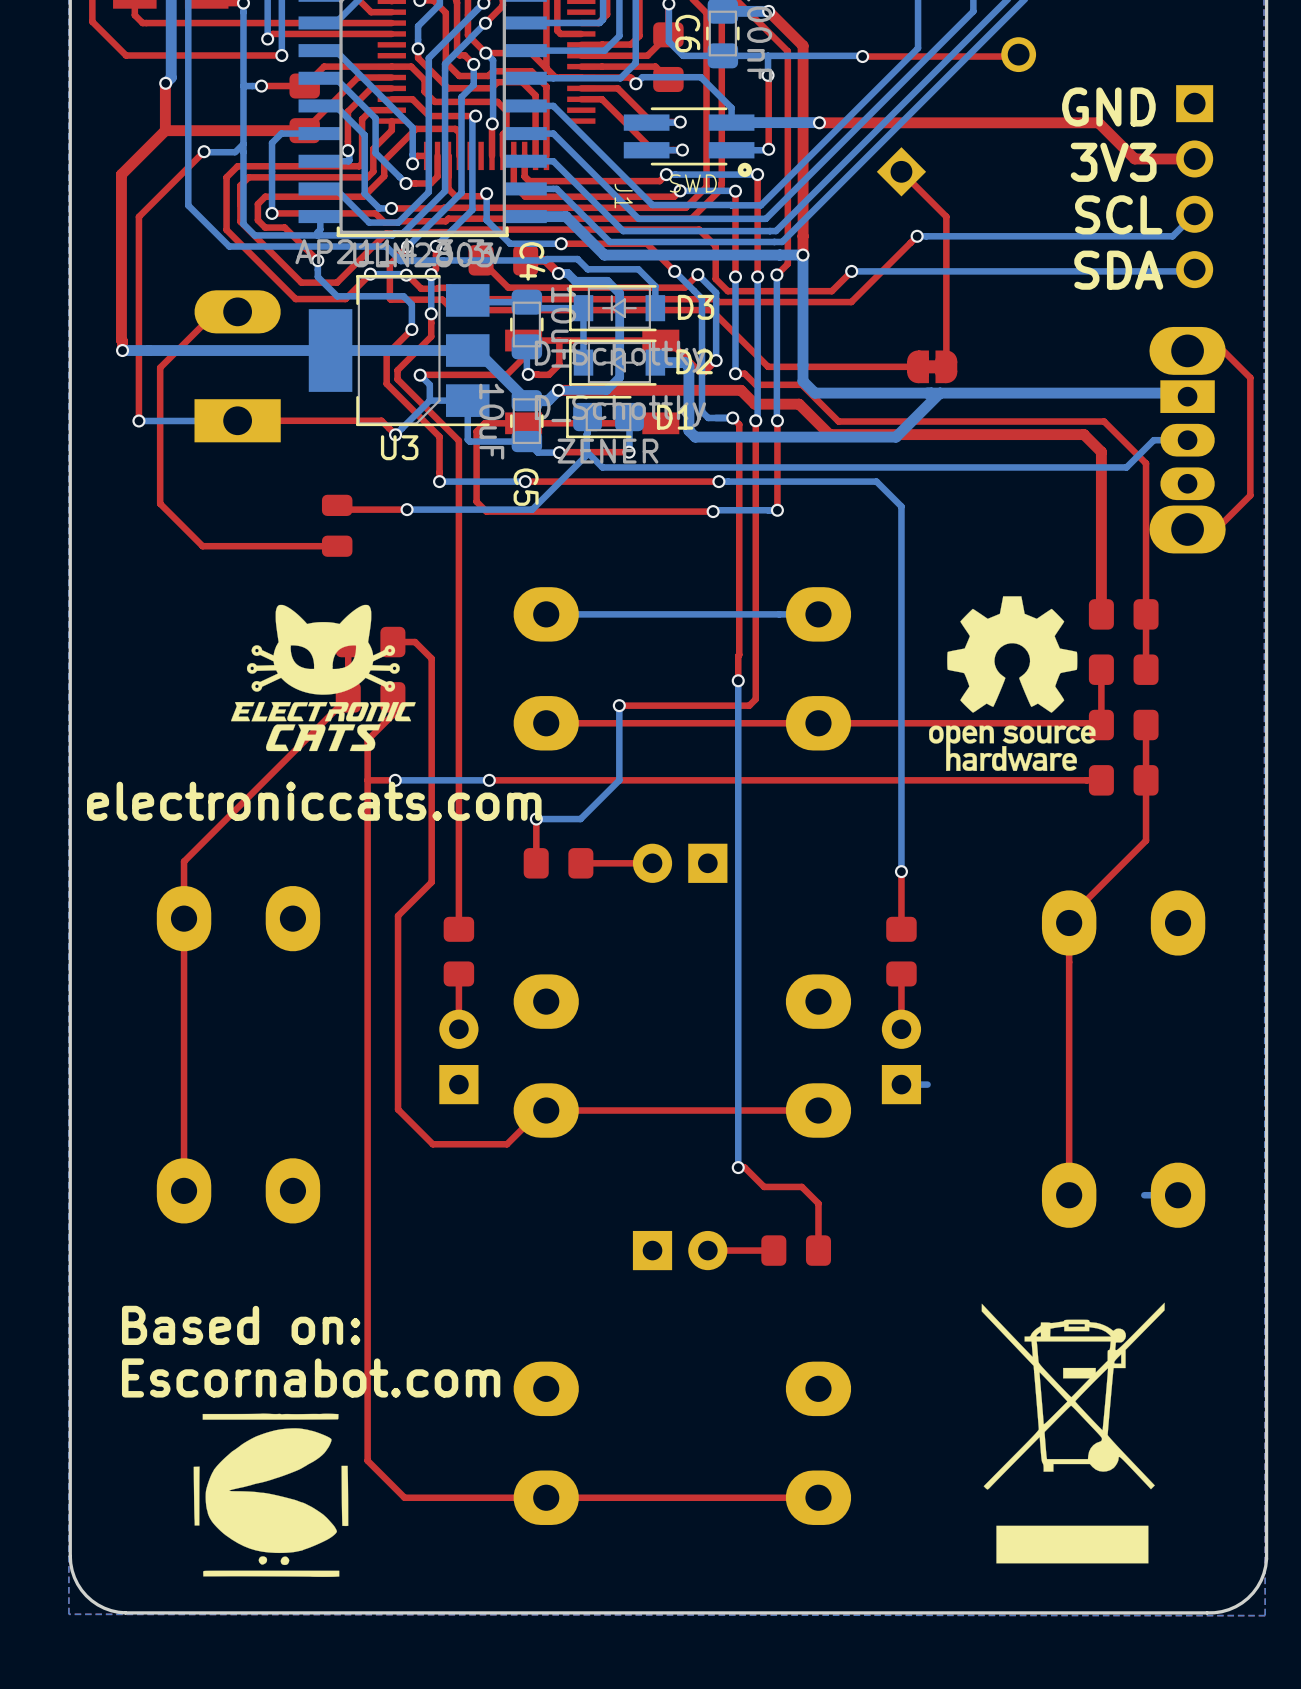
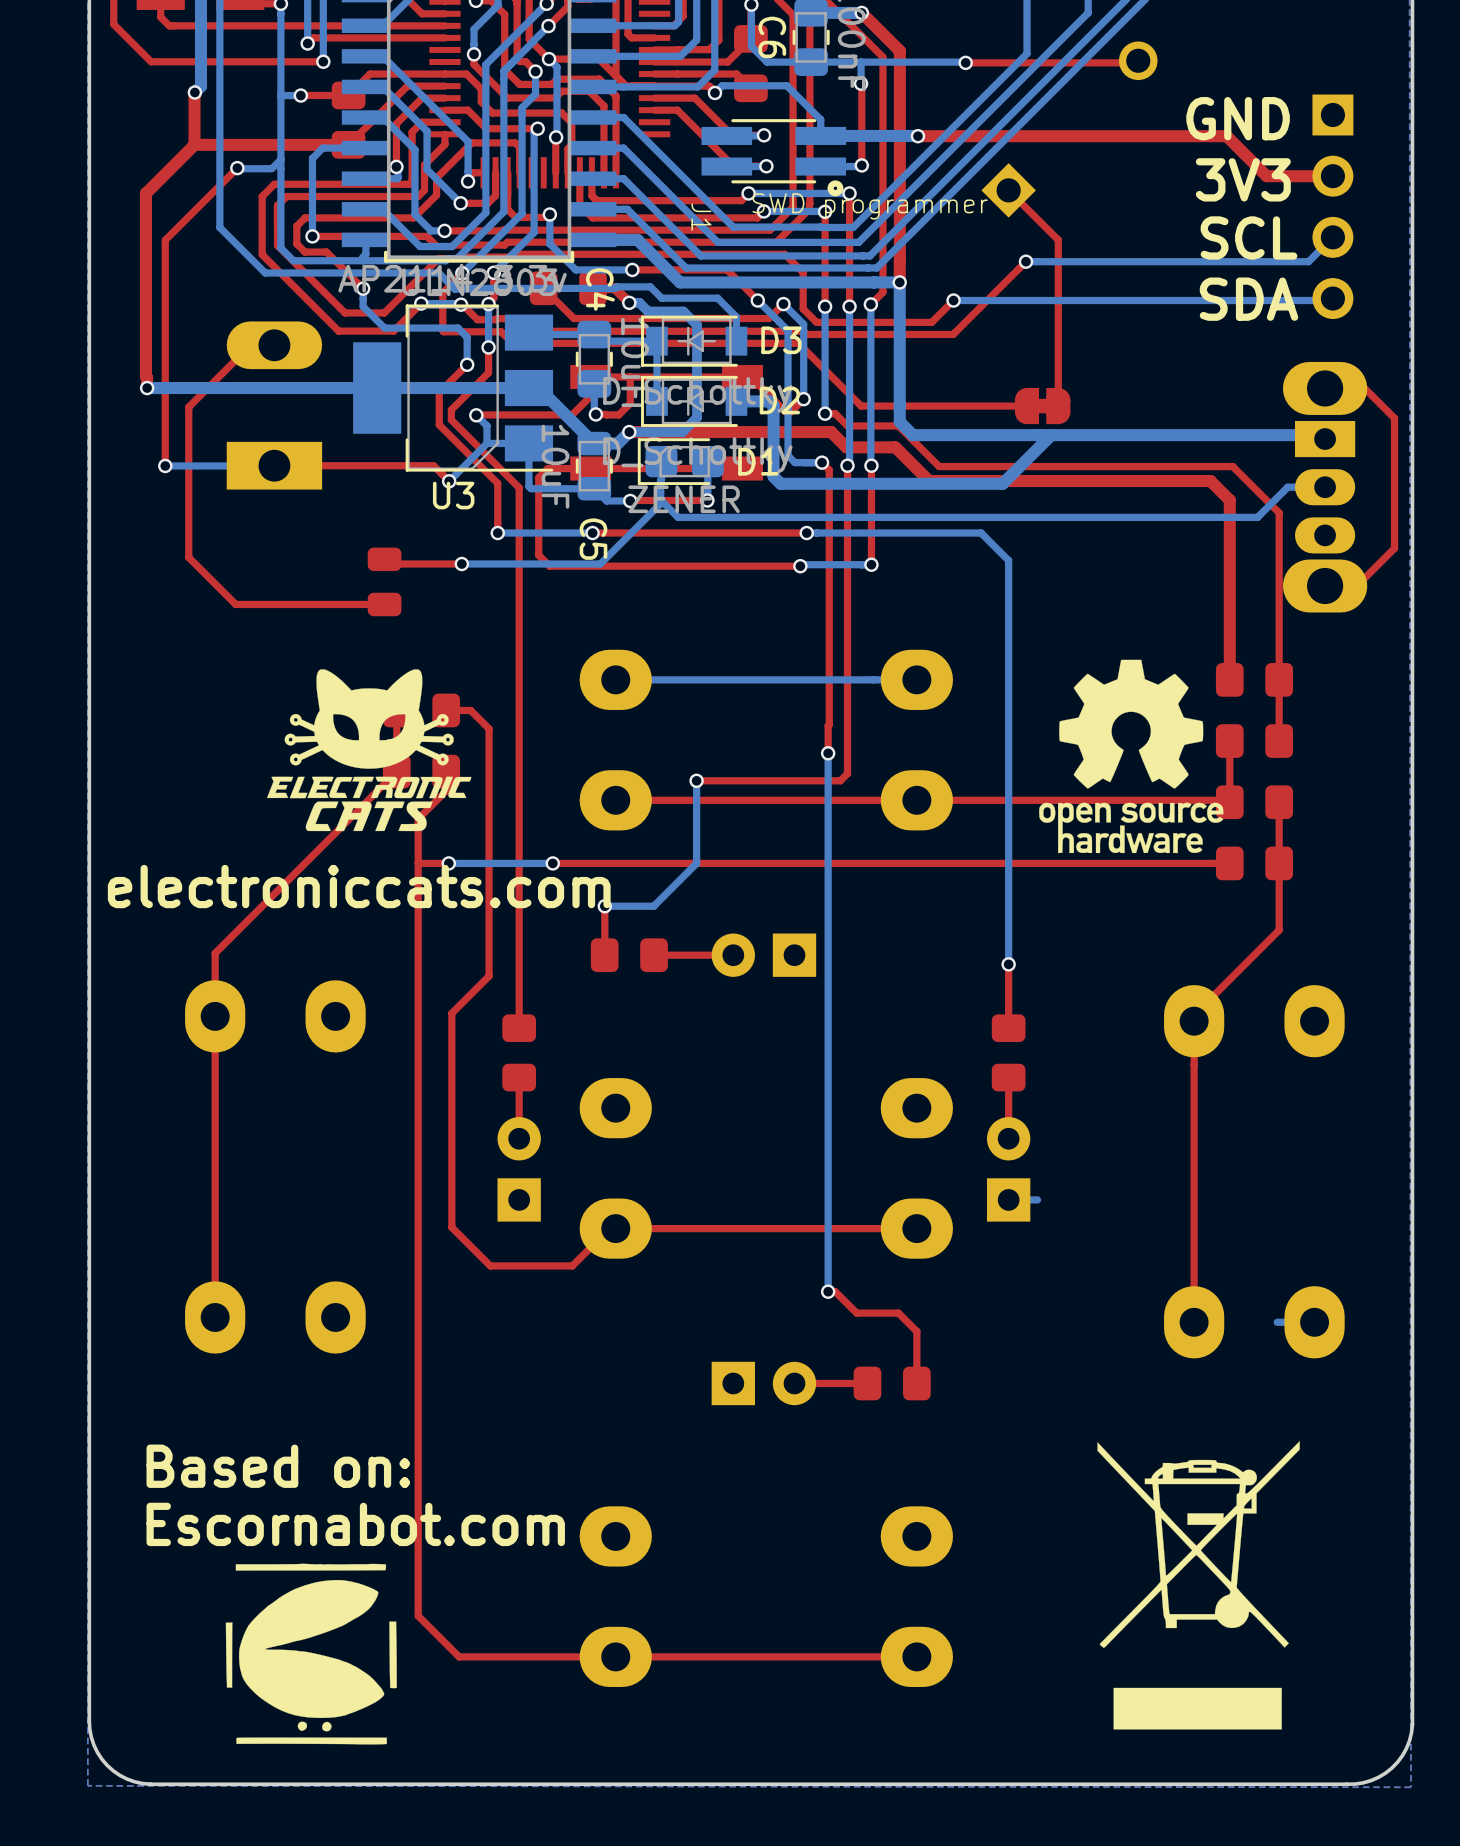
J1 value: SWD (693, 183) -> SWD programmer (870, 206)

